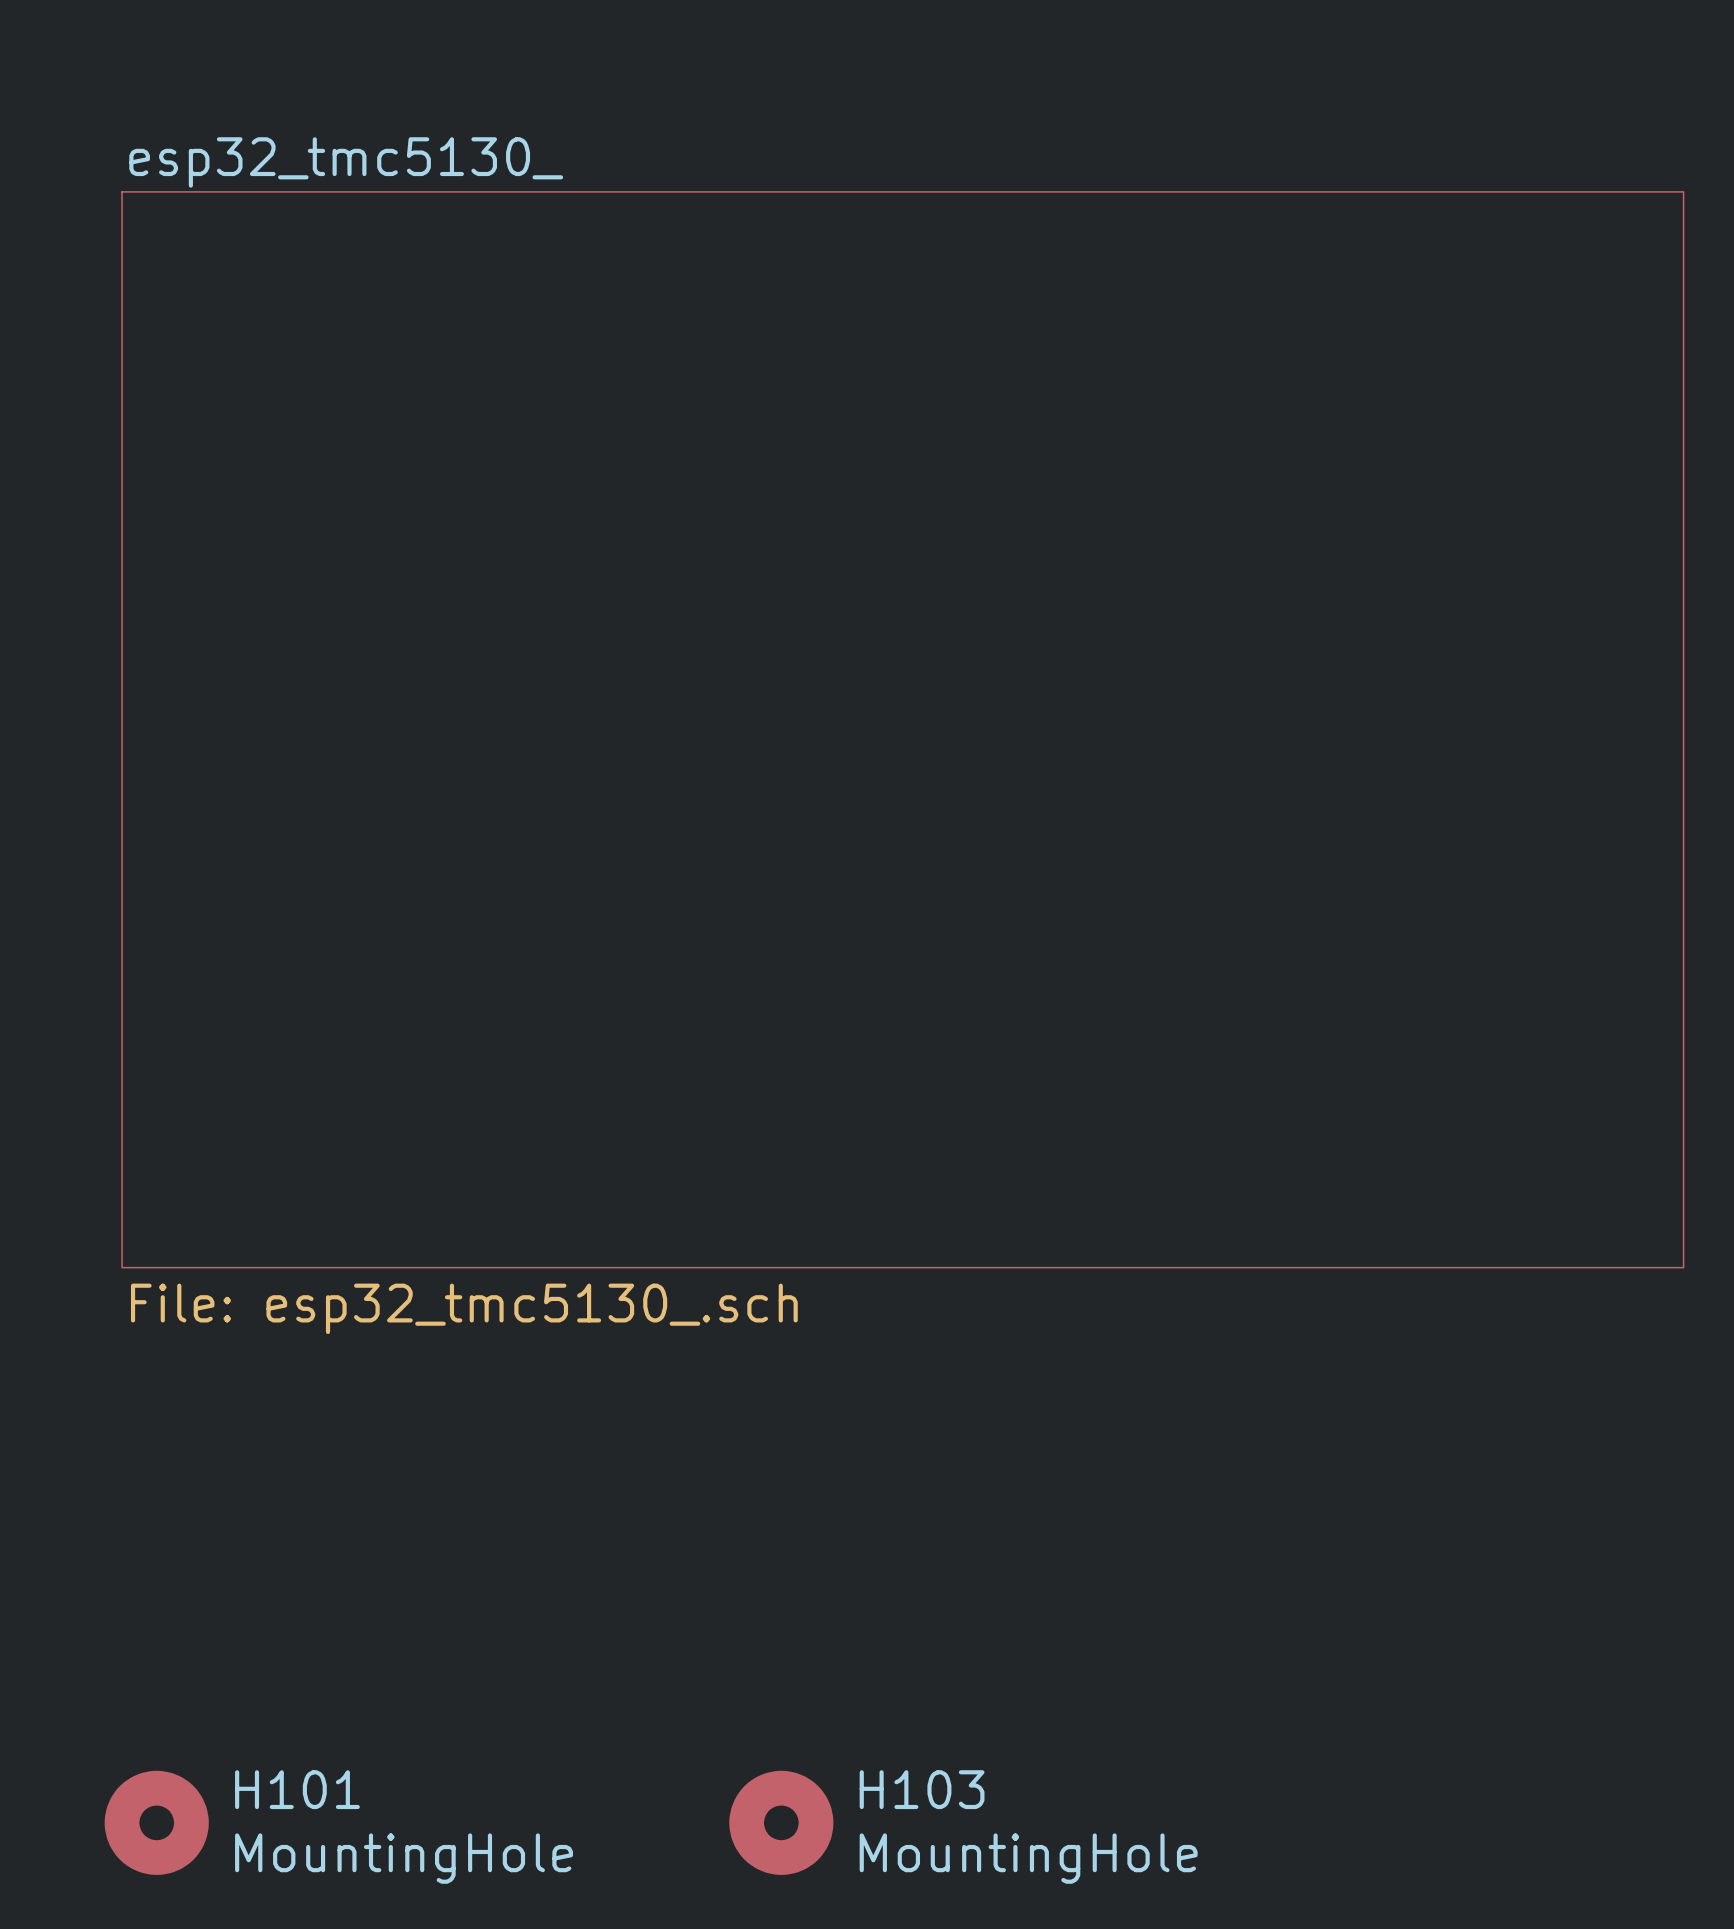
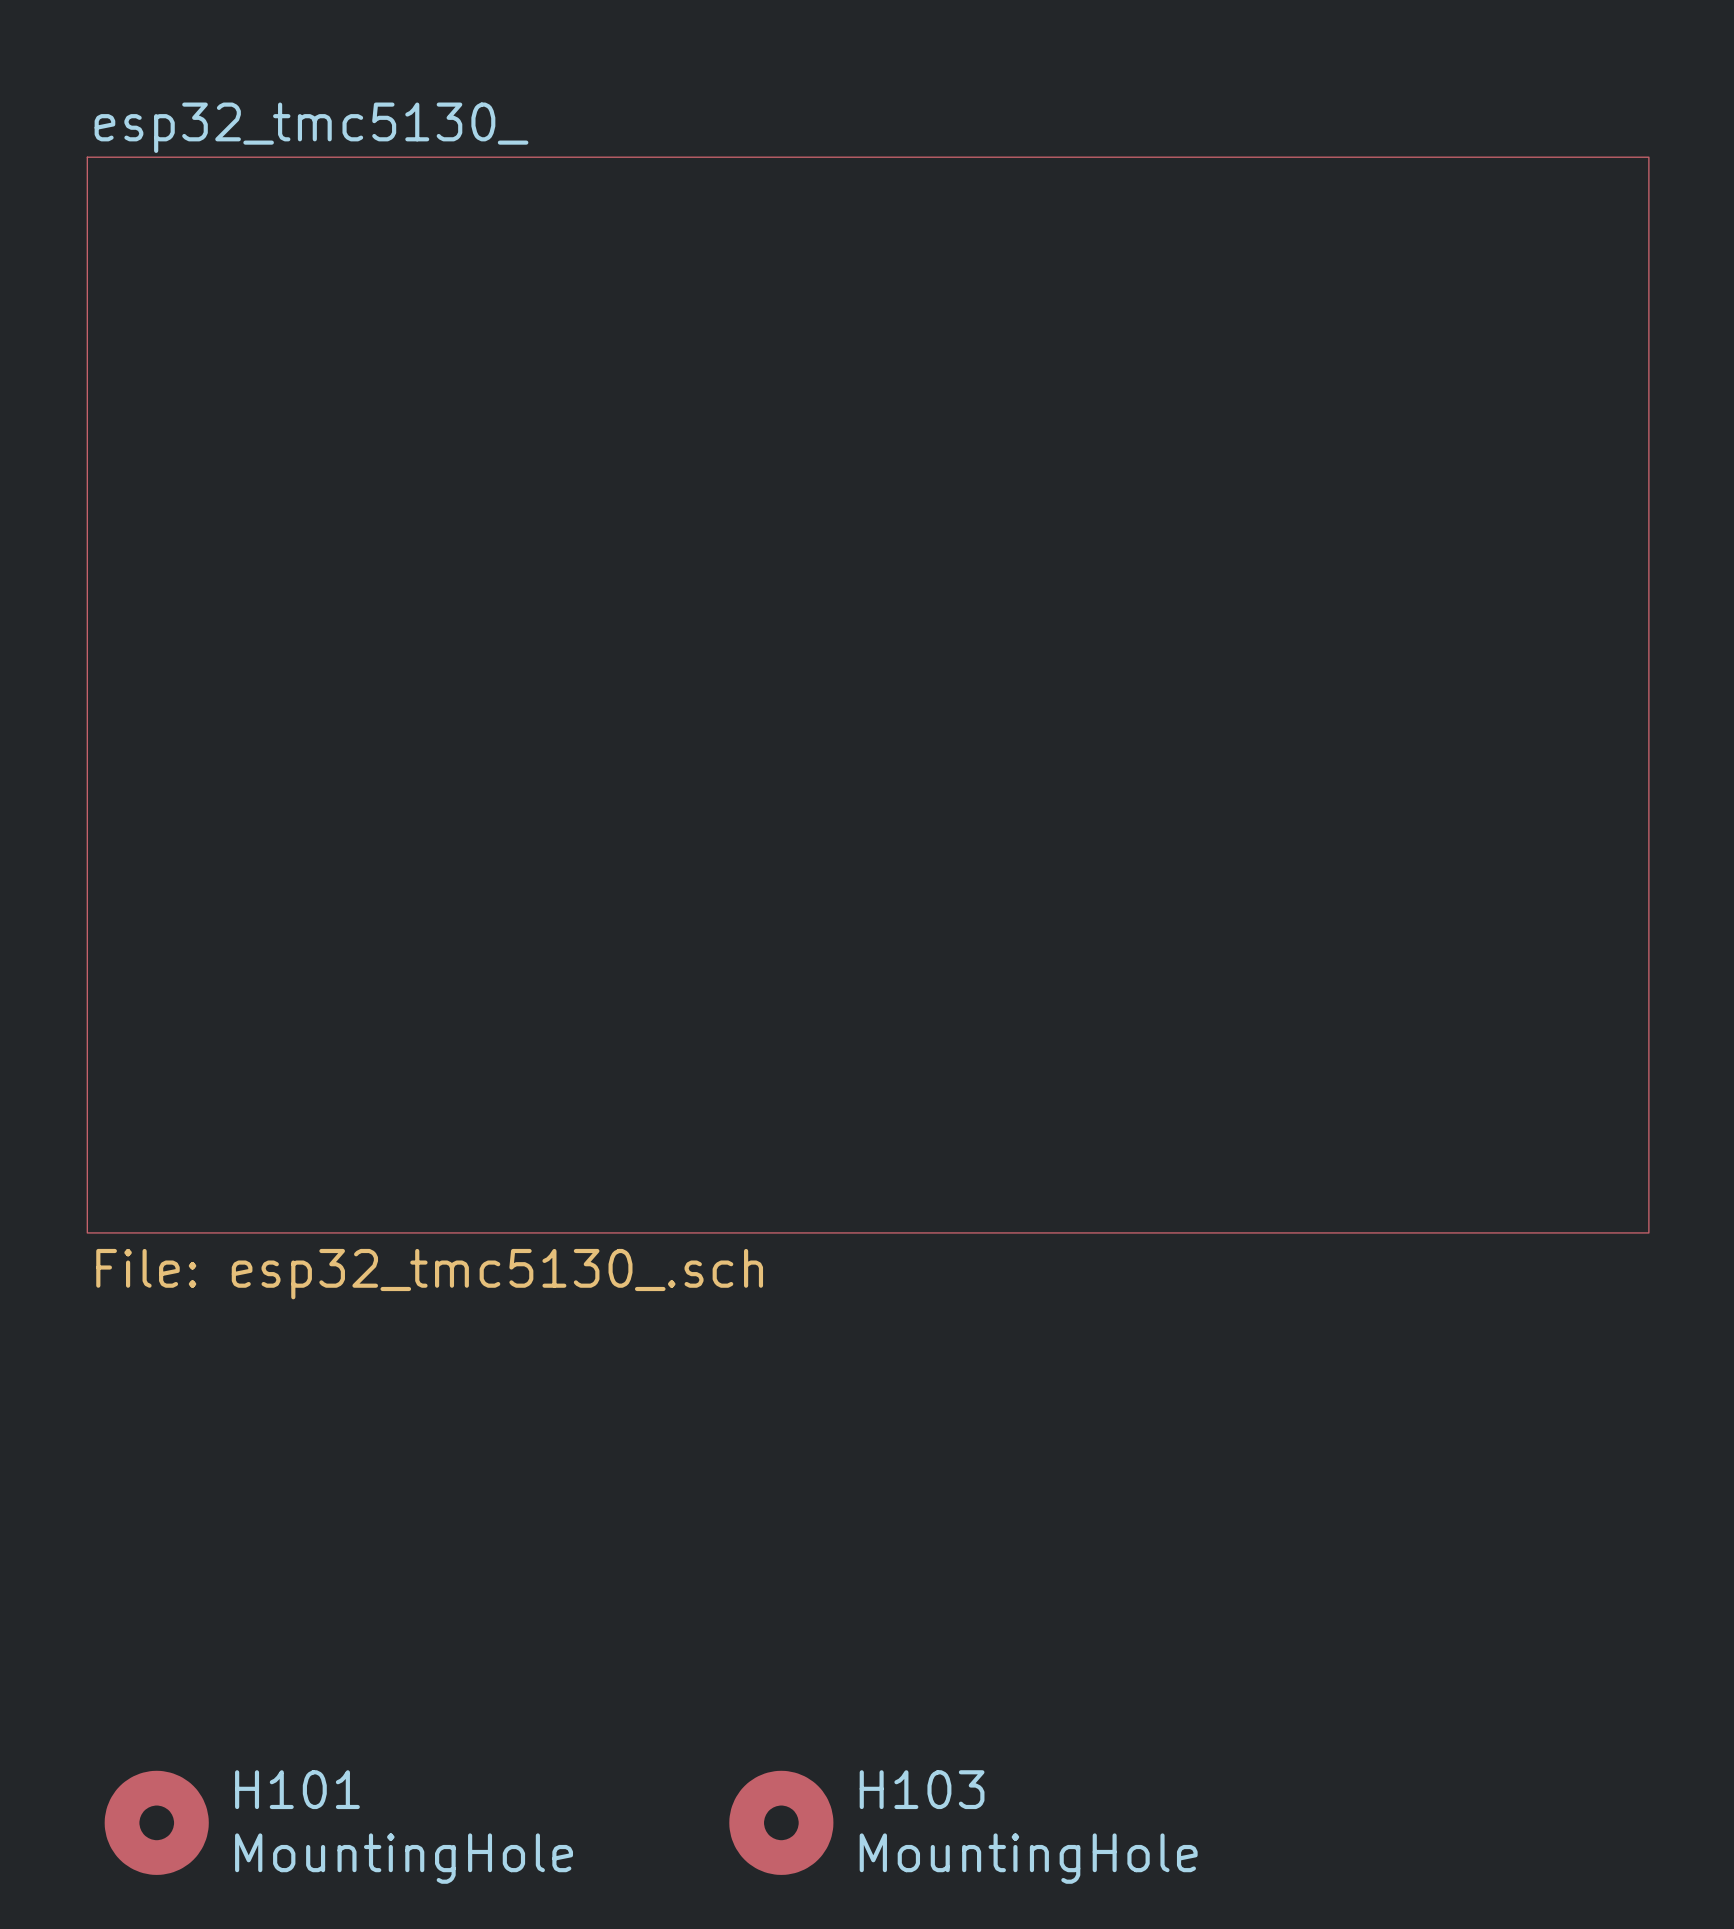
sheet esp32_tmc5130_ position: (902, 729) -> (868, 695)

